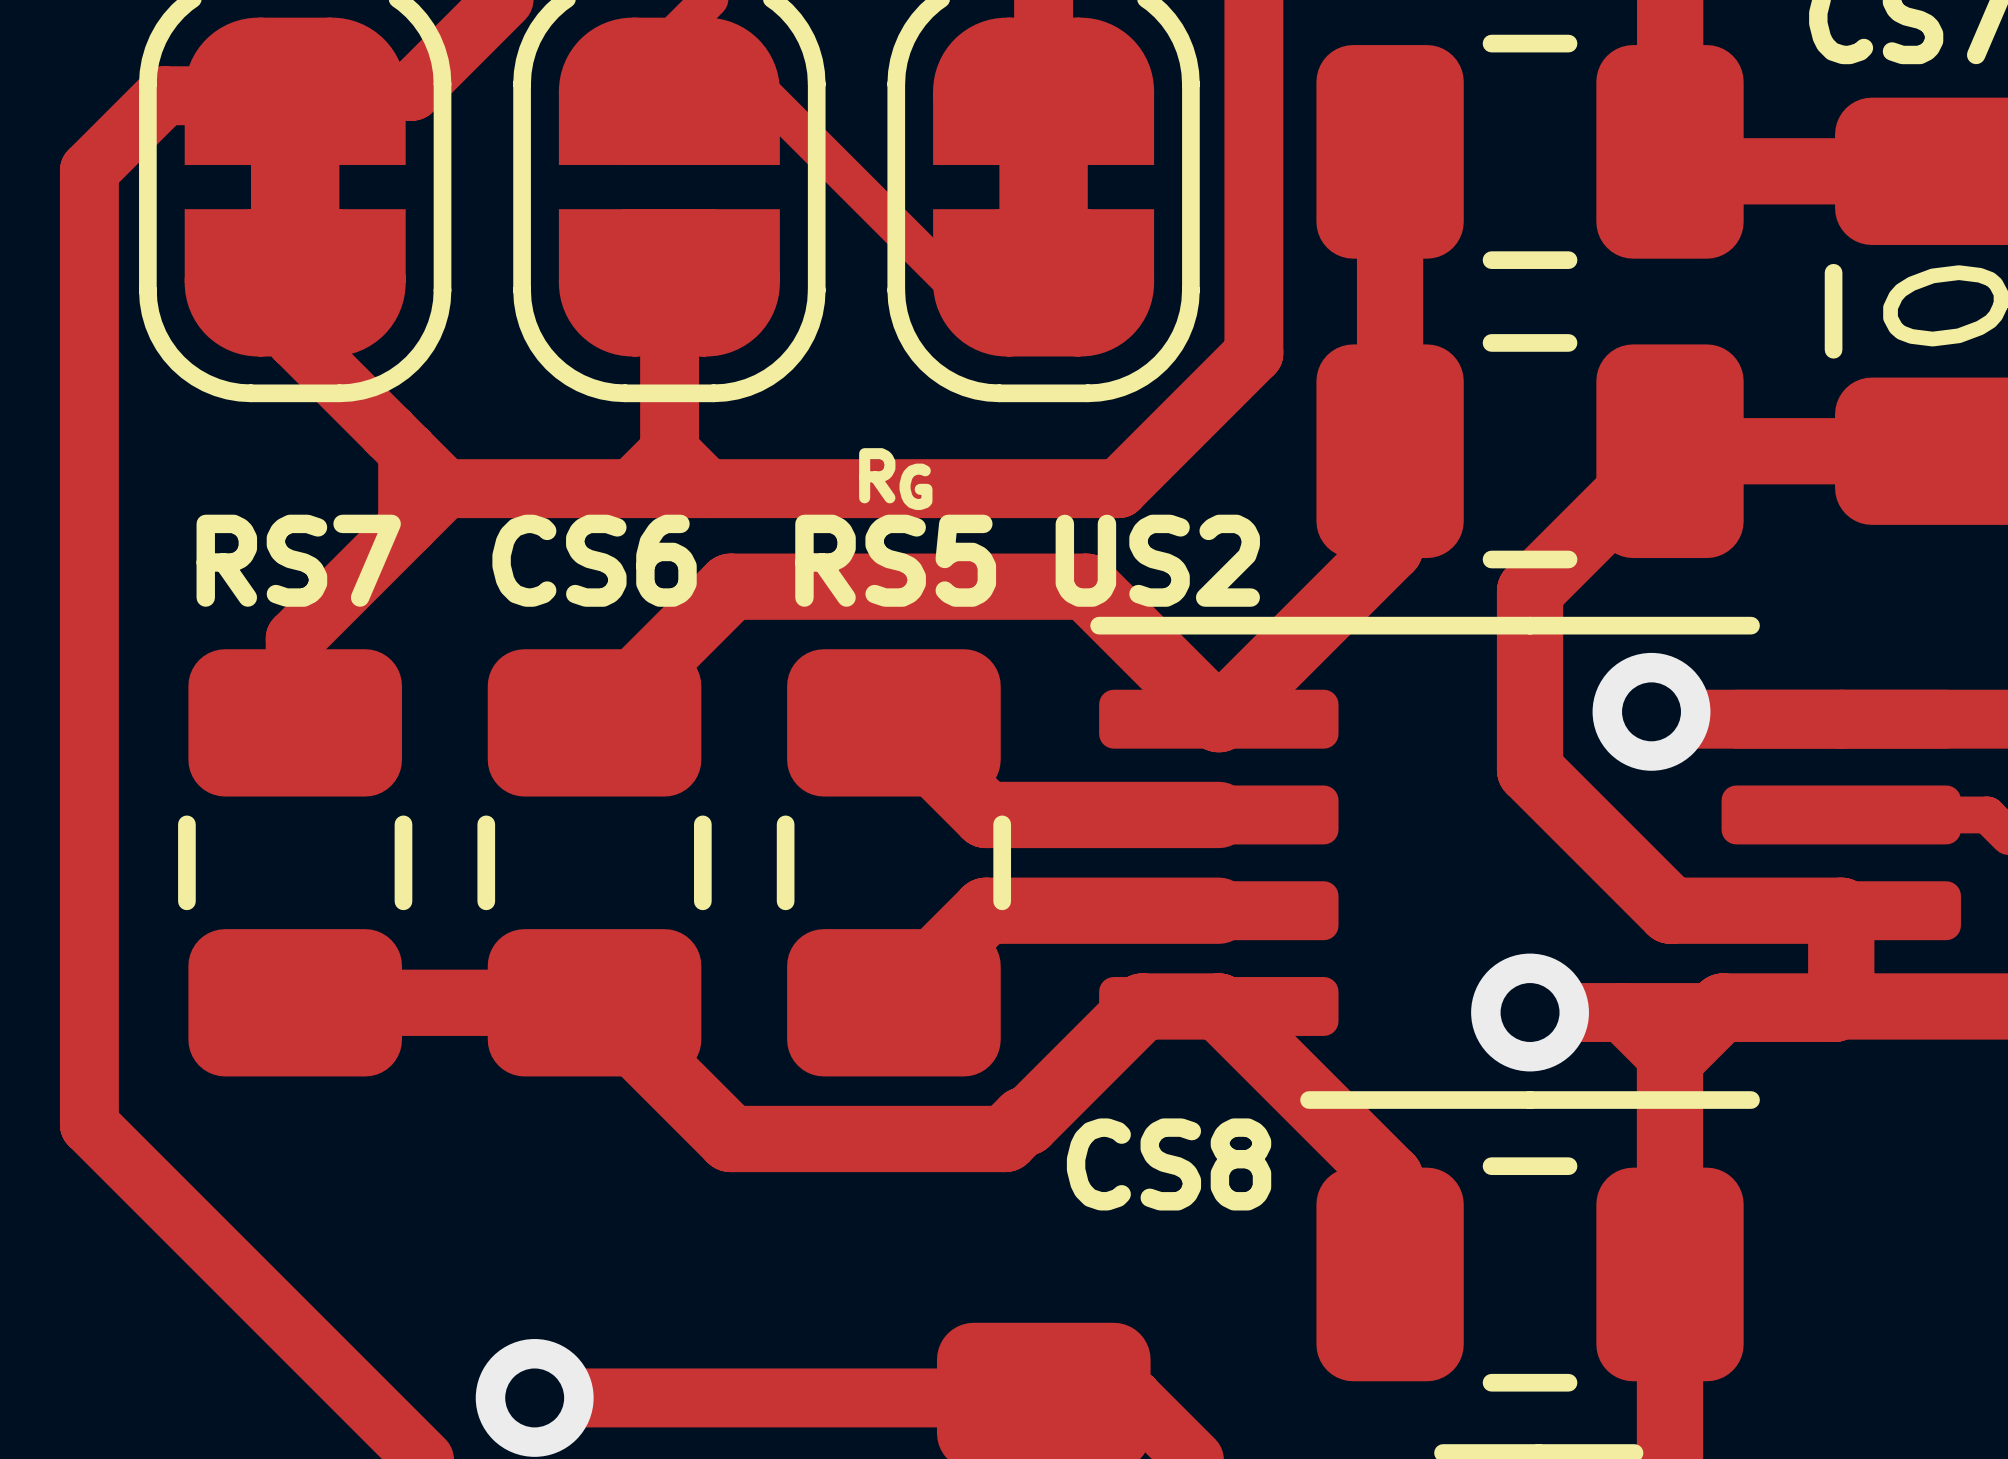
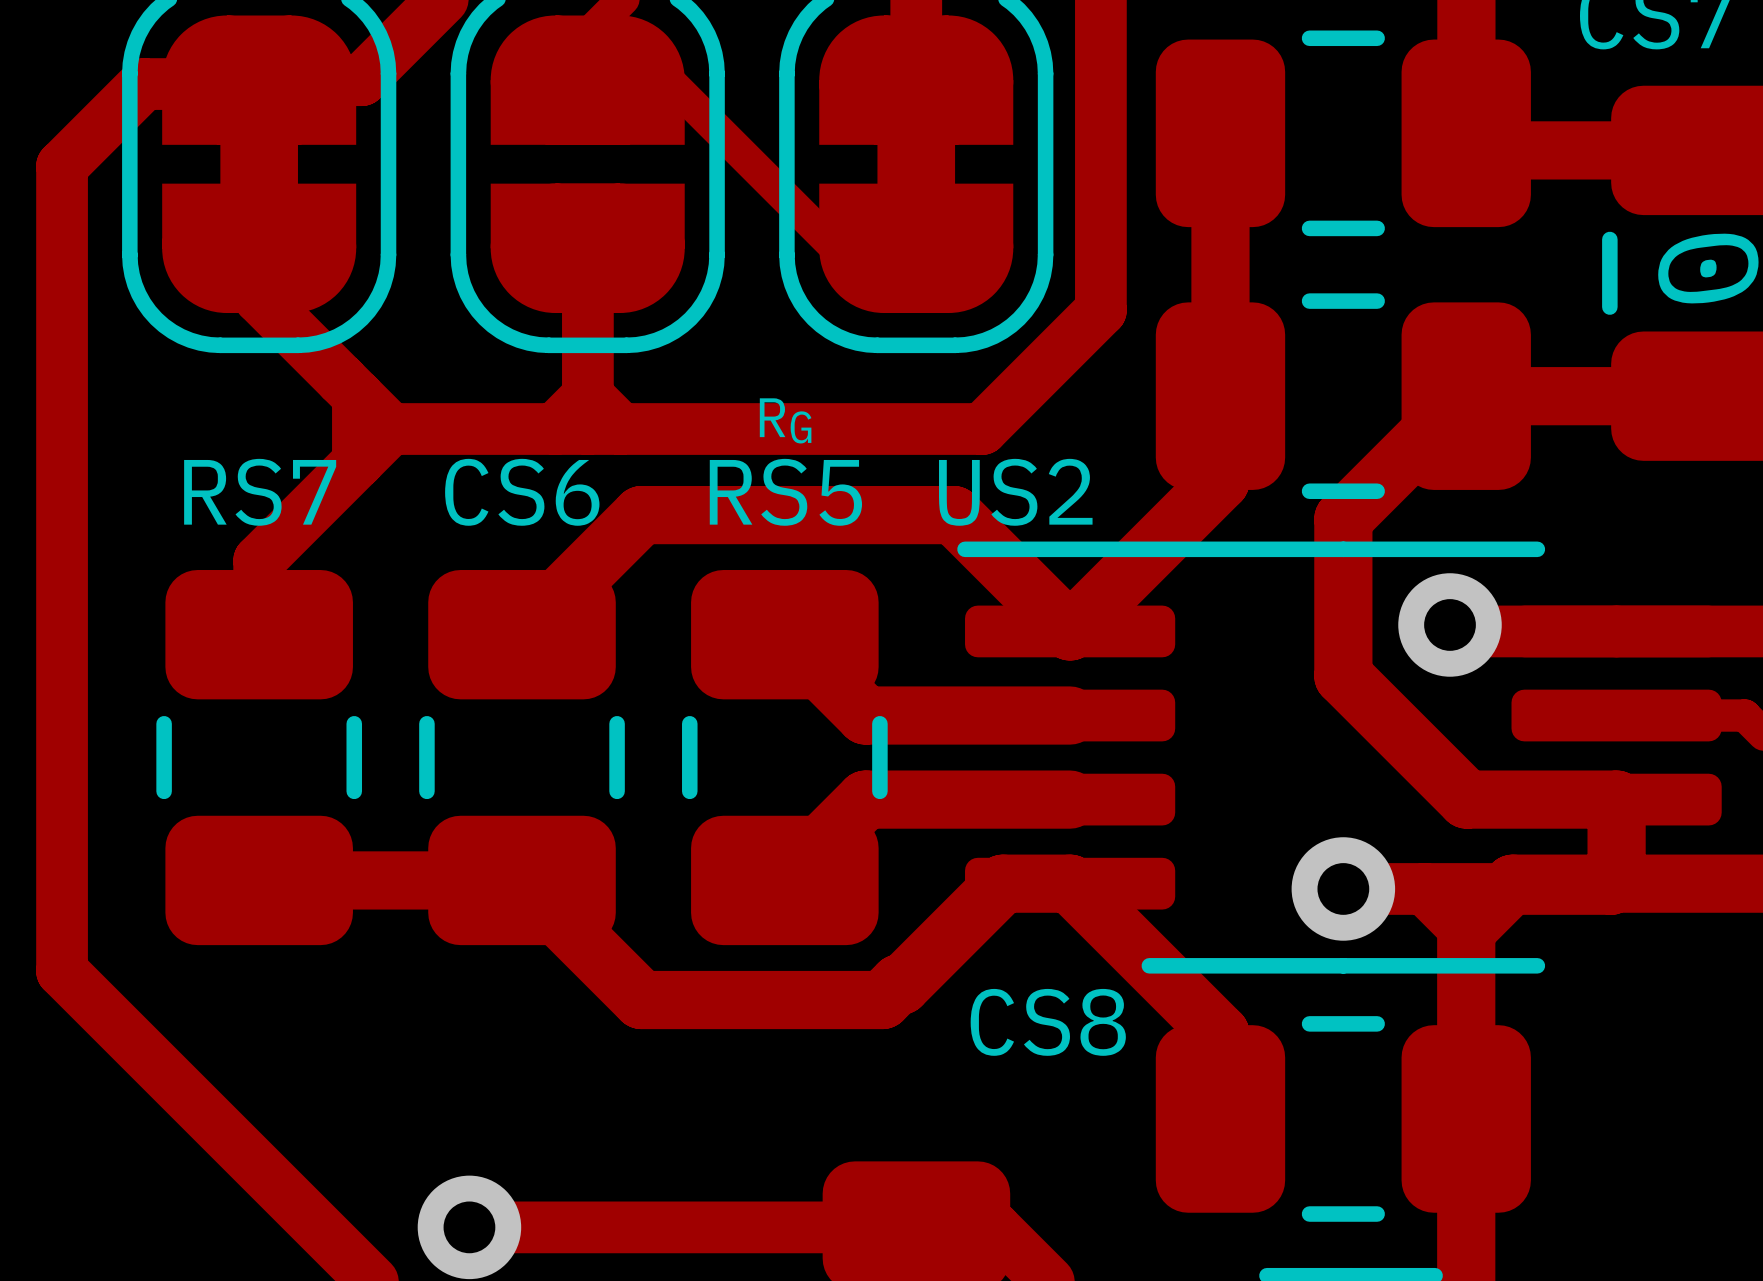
track: (89, 170) (89, 1124) -> (78, 149) (62, 166) (62, 971) (78, 987)

